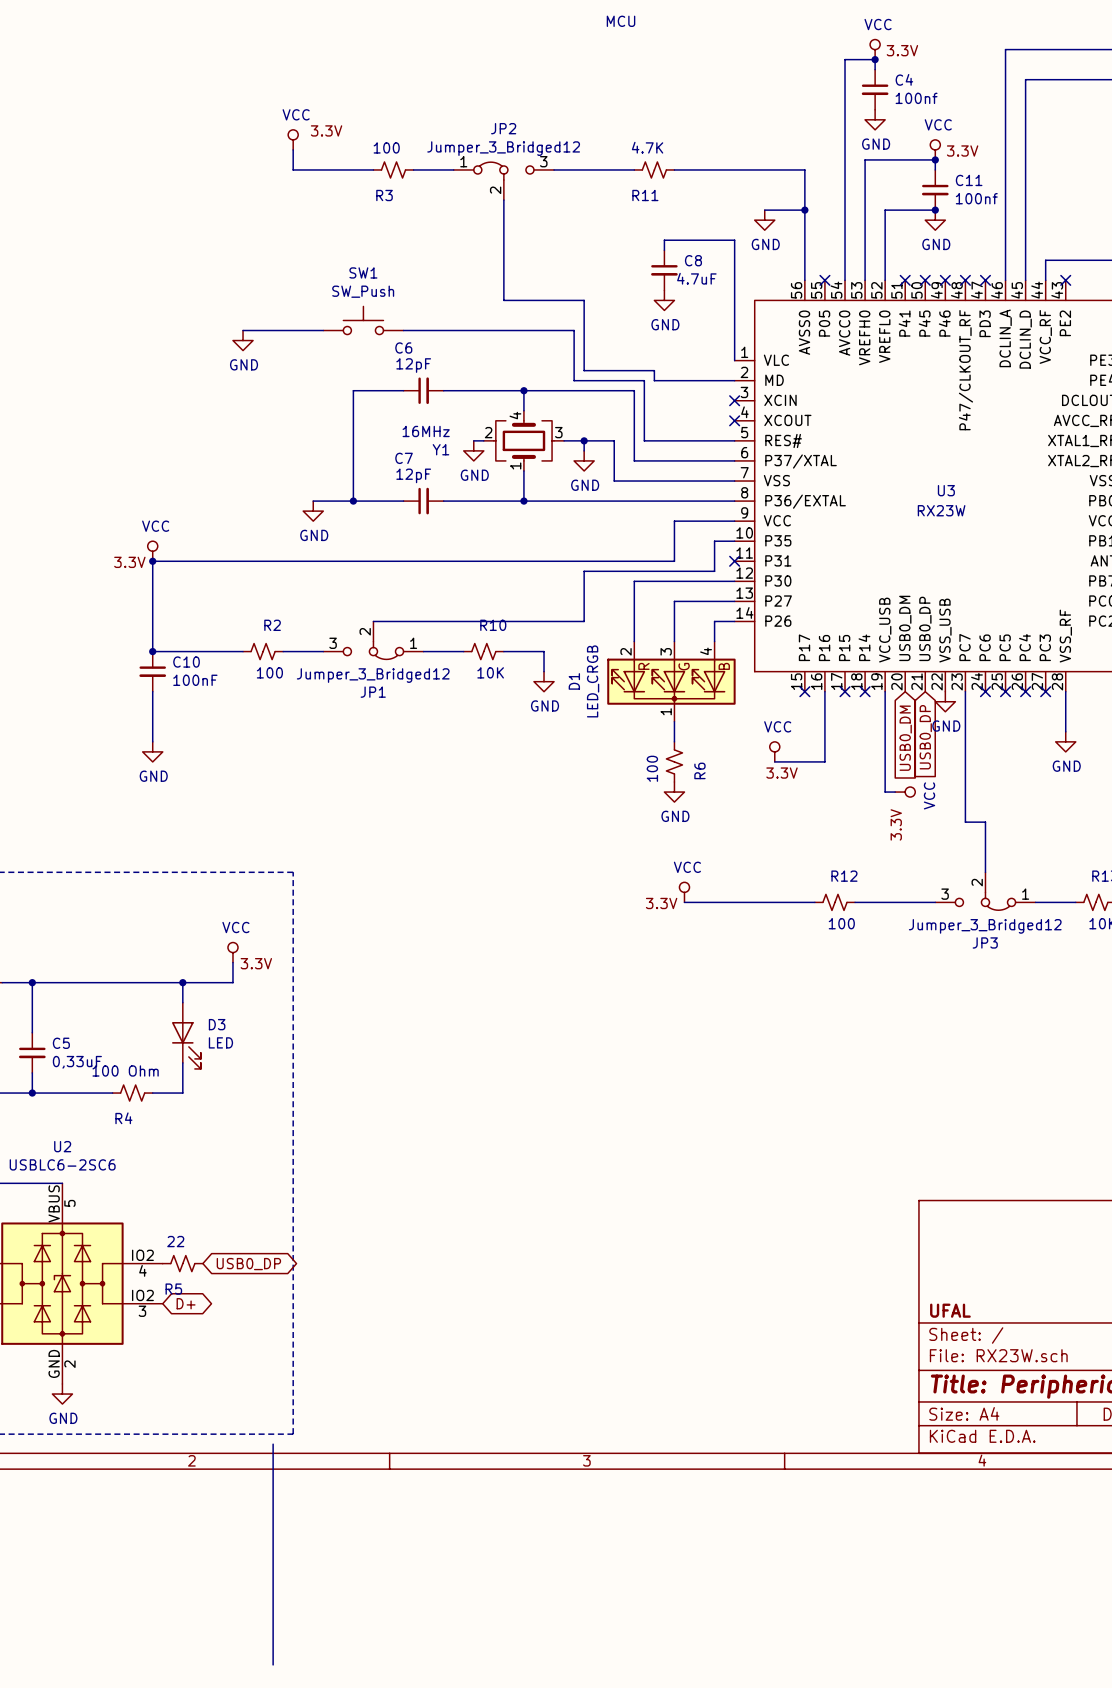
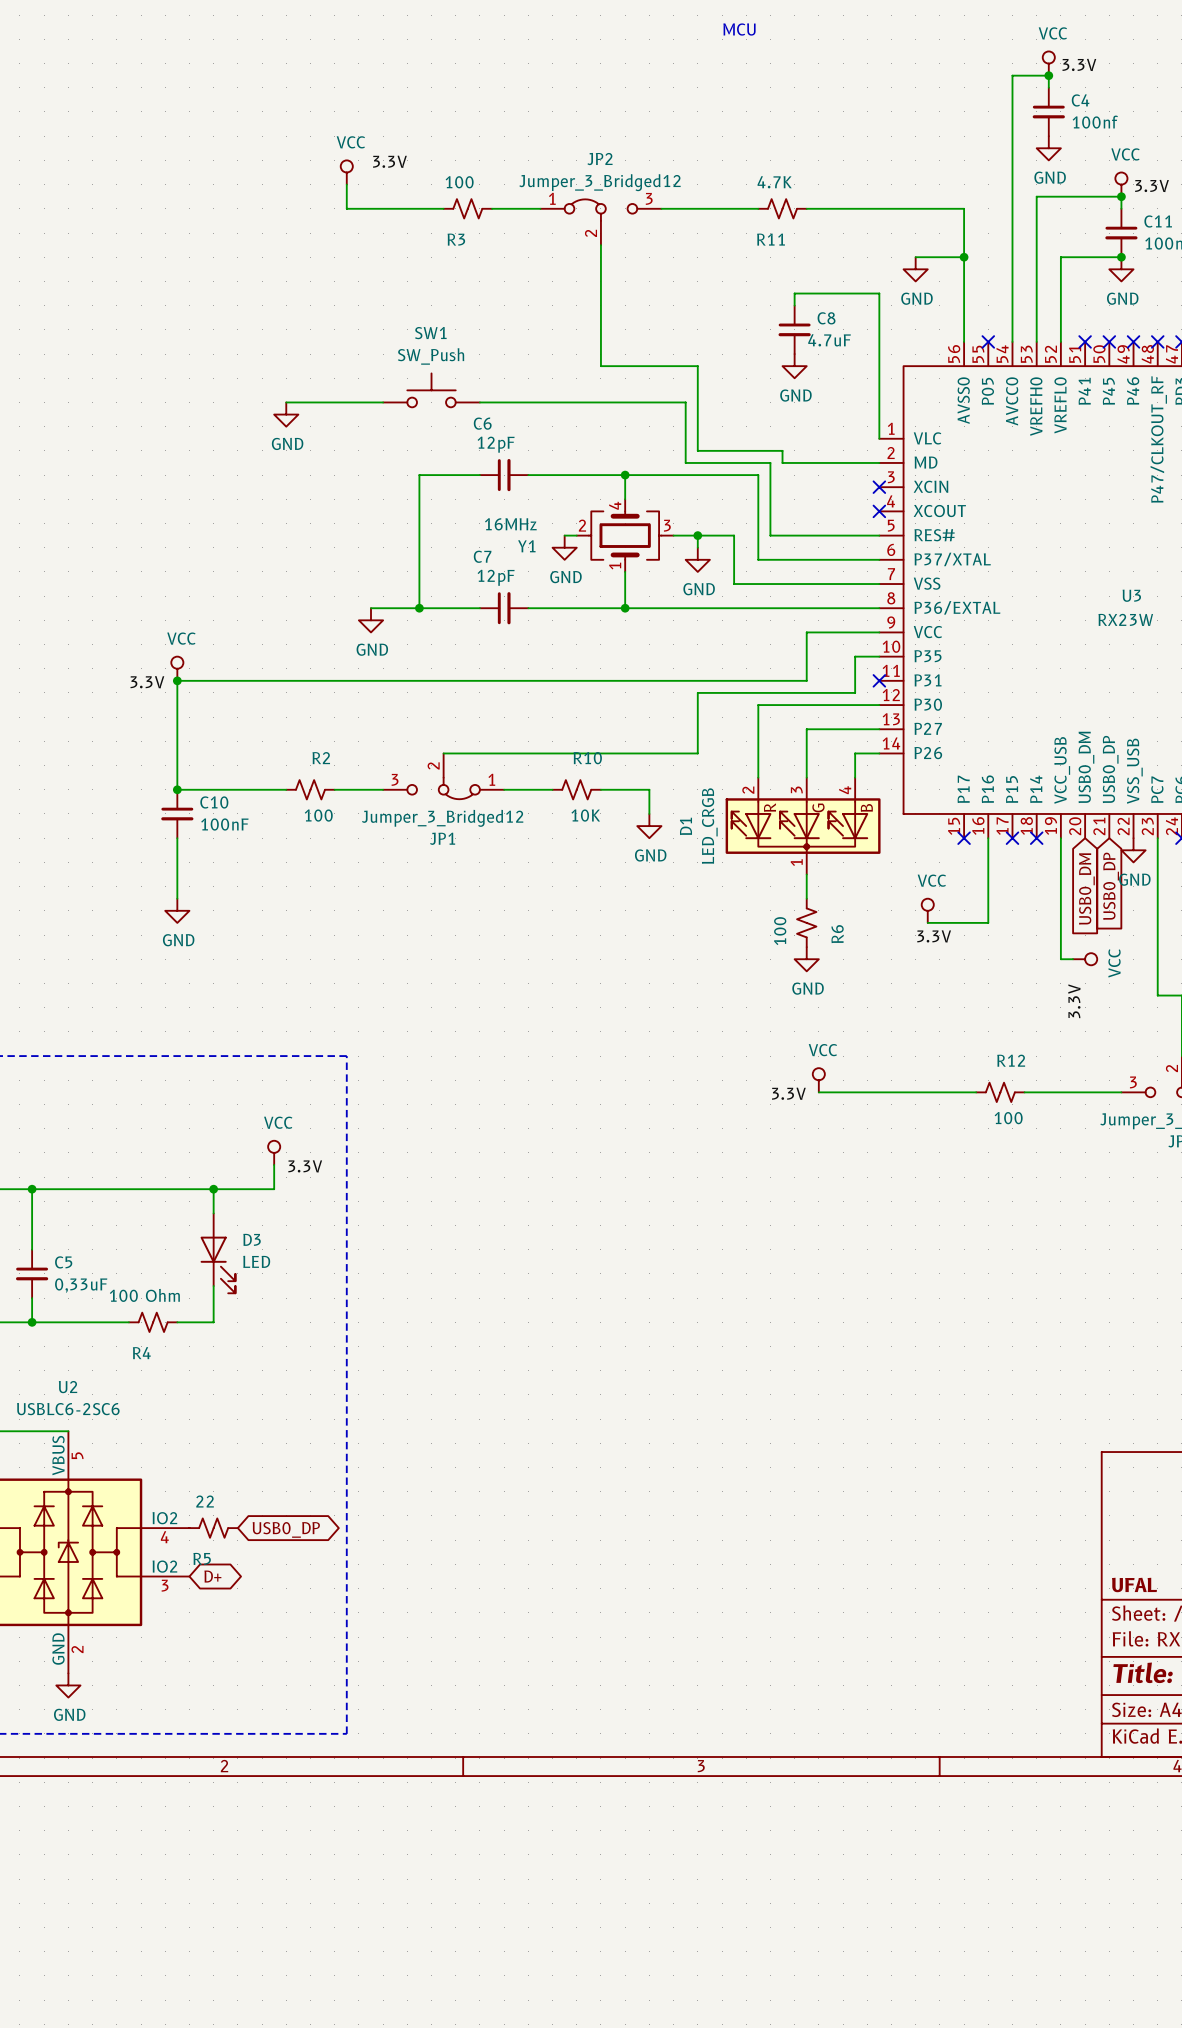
wire: (273, 1444) (273, 1664) -> none

